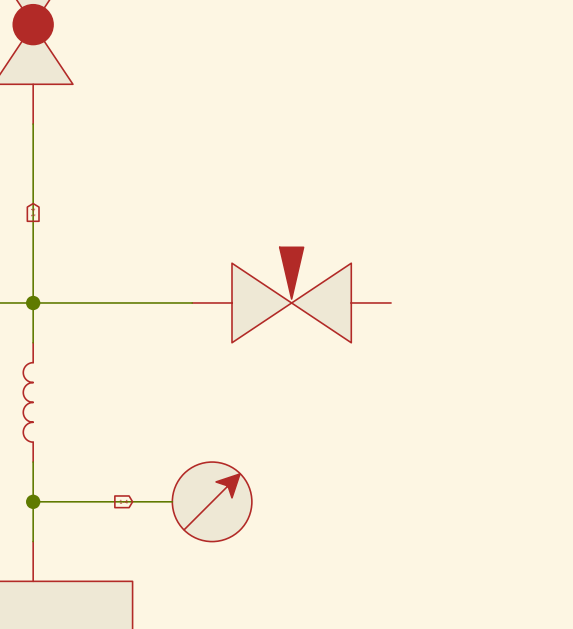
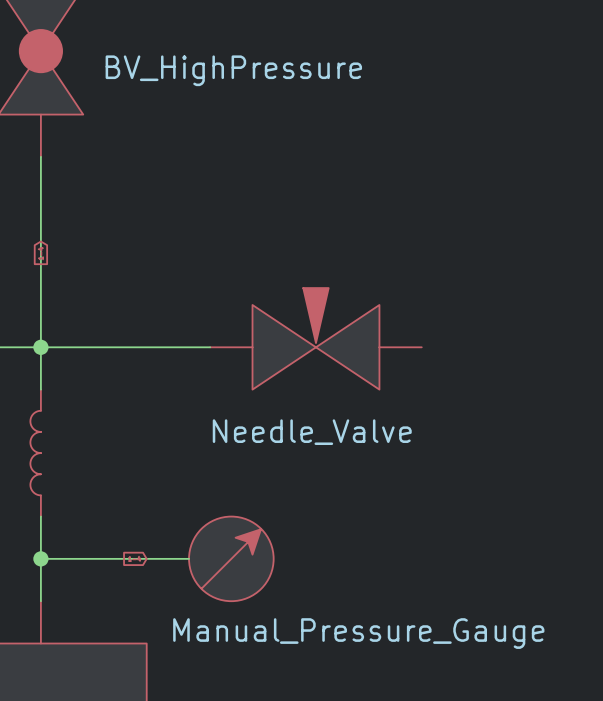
BV_HighPressure name: none -> BV_HighPressure (233, 70)
Needle_Valve name: none -> Needle_Valve (312, 432)
Manual_Pressure_Gauge name: none -> Manual_Pressure_Gauge (358, 633)

